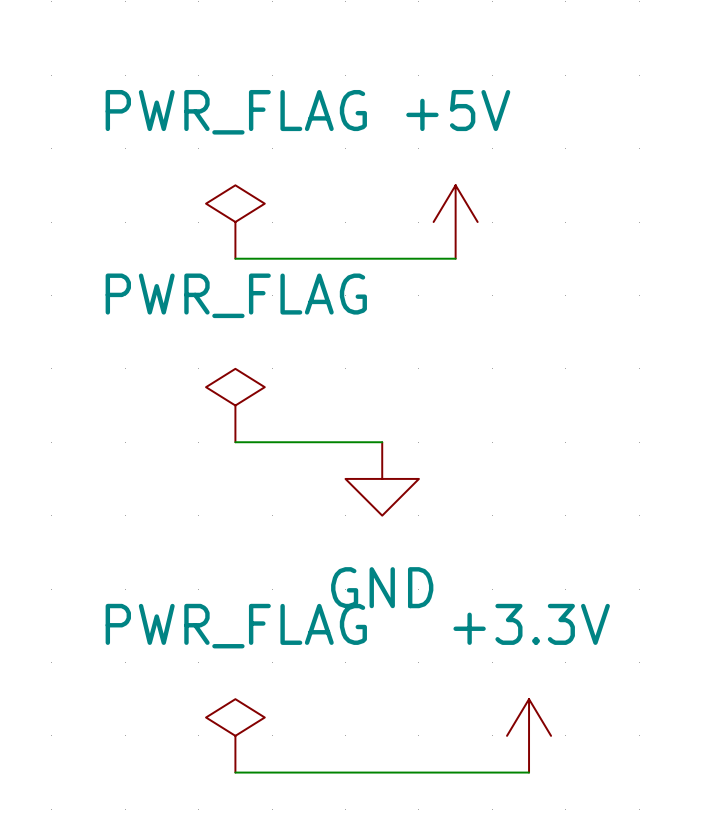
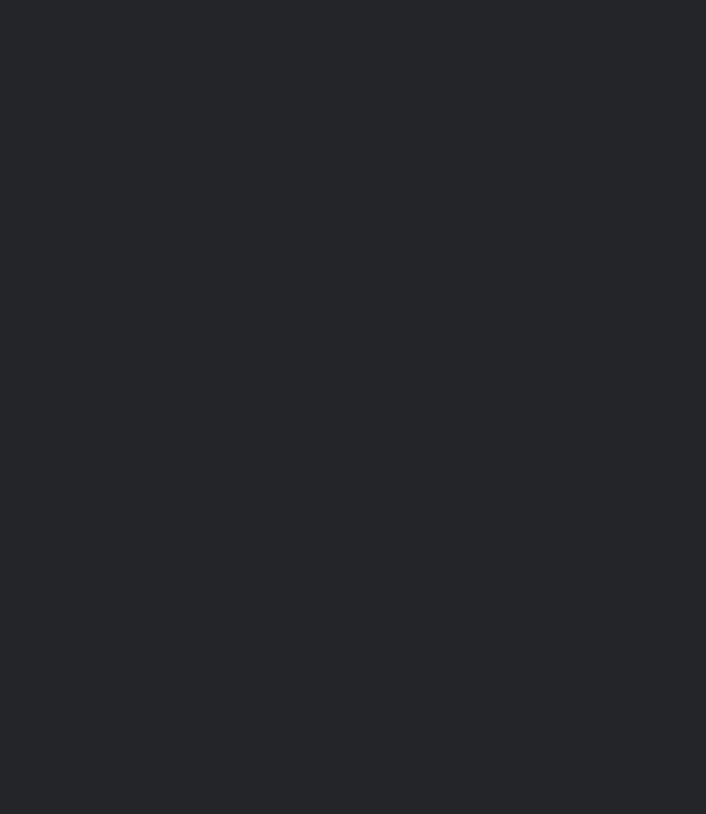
power symbol: PWR_FLAG (235, 222) -> none
power symbol: +5V (455, 222) -> none
wire: (235, 258) (455, 258) -> none
power symbol: PWR_FLAG (235, 405) -> none
wire: (235, 442) (382, 442) -> none
power symbol: GND (382, 478) -> none
power symbol: PWR_FLAG (235, 735) -> none
power symbol: +3.3V (529, 735) -> none
wire: (235, 772) (529, 772) -> none

